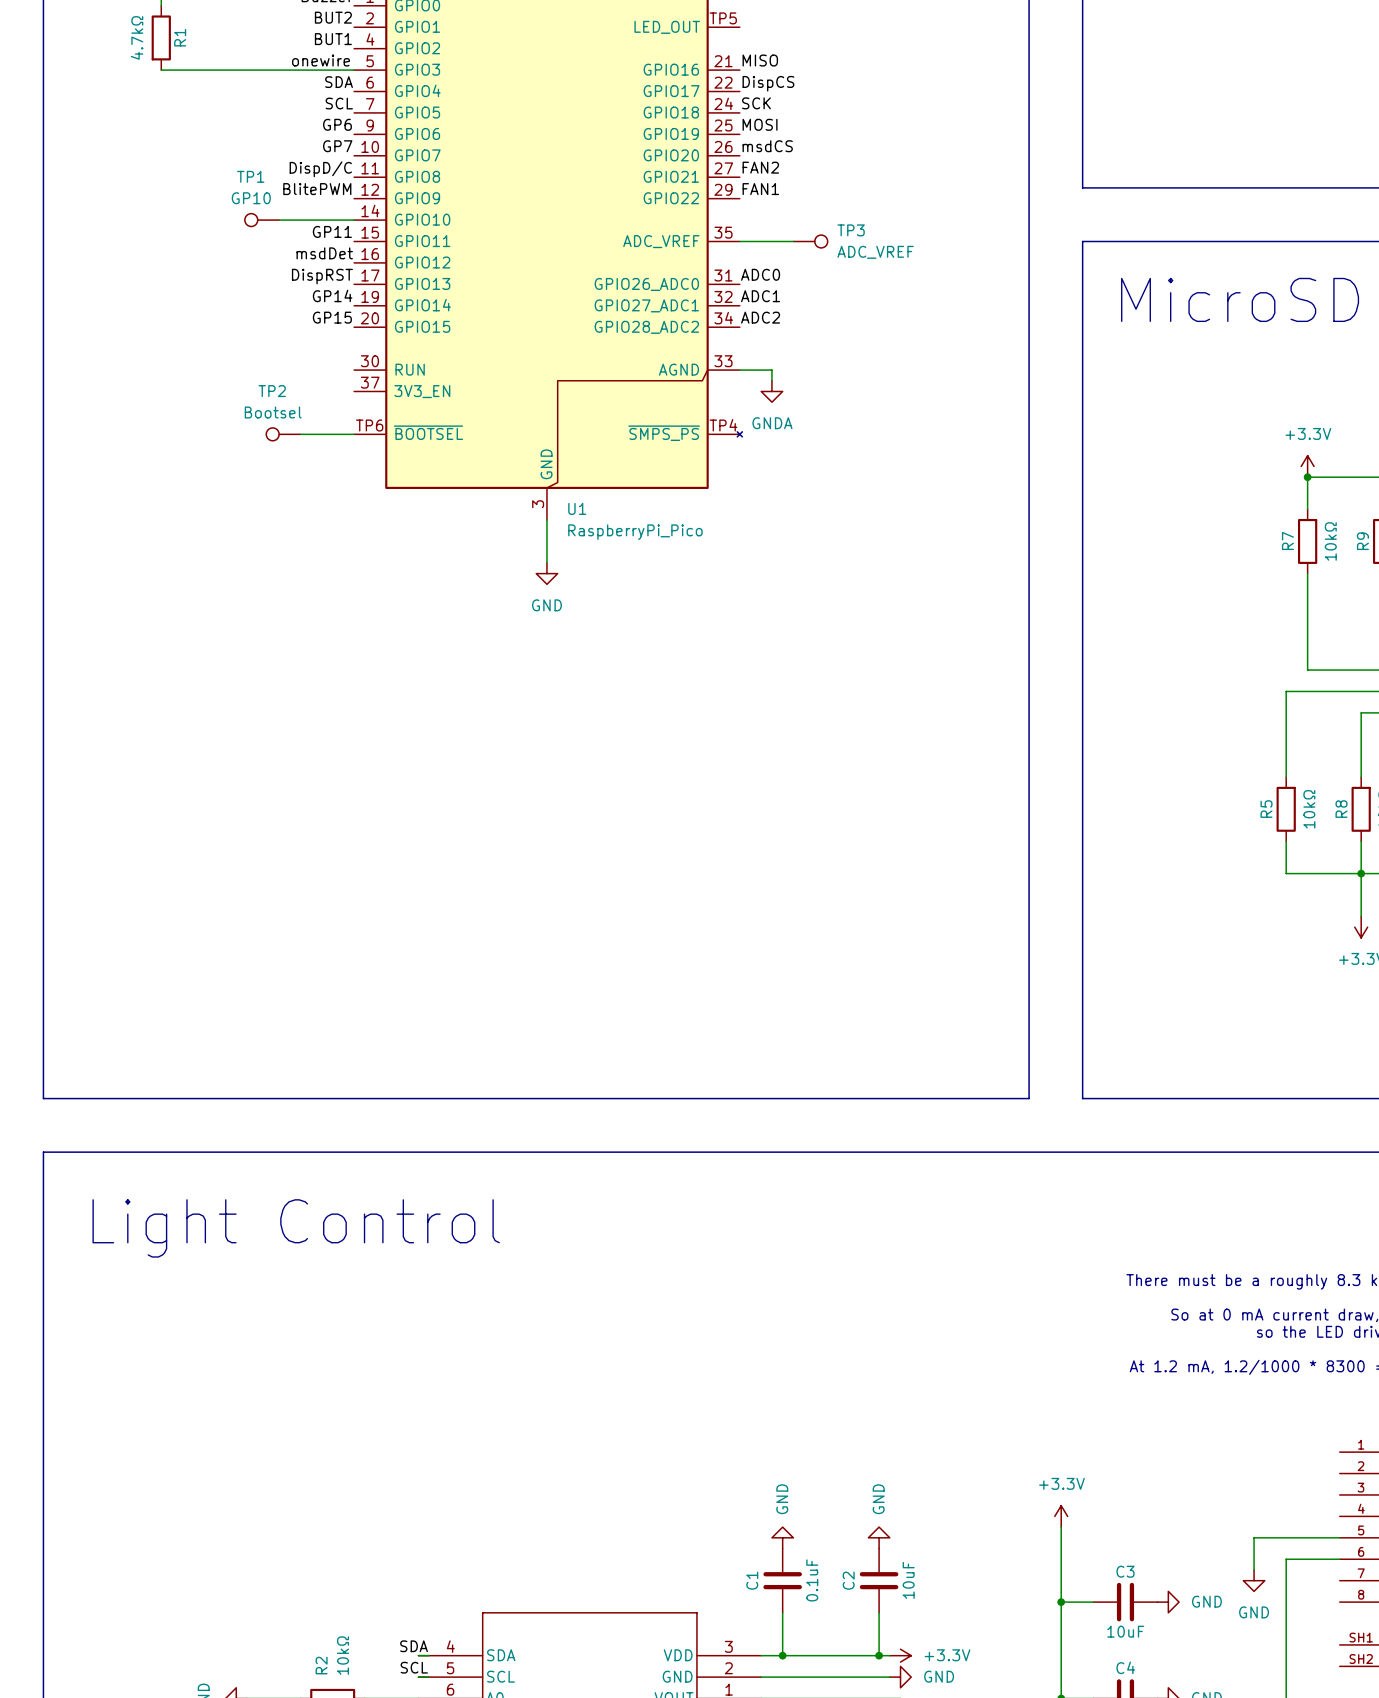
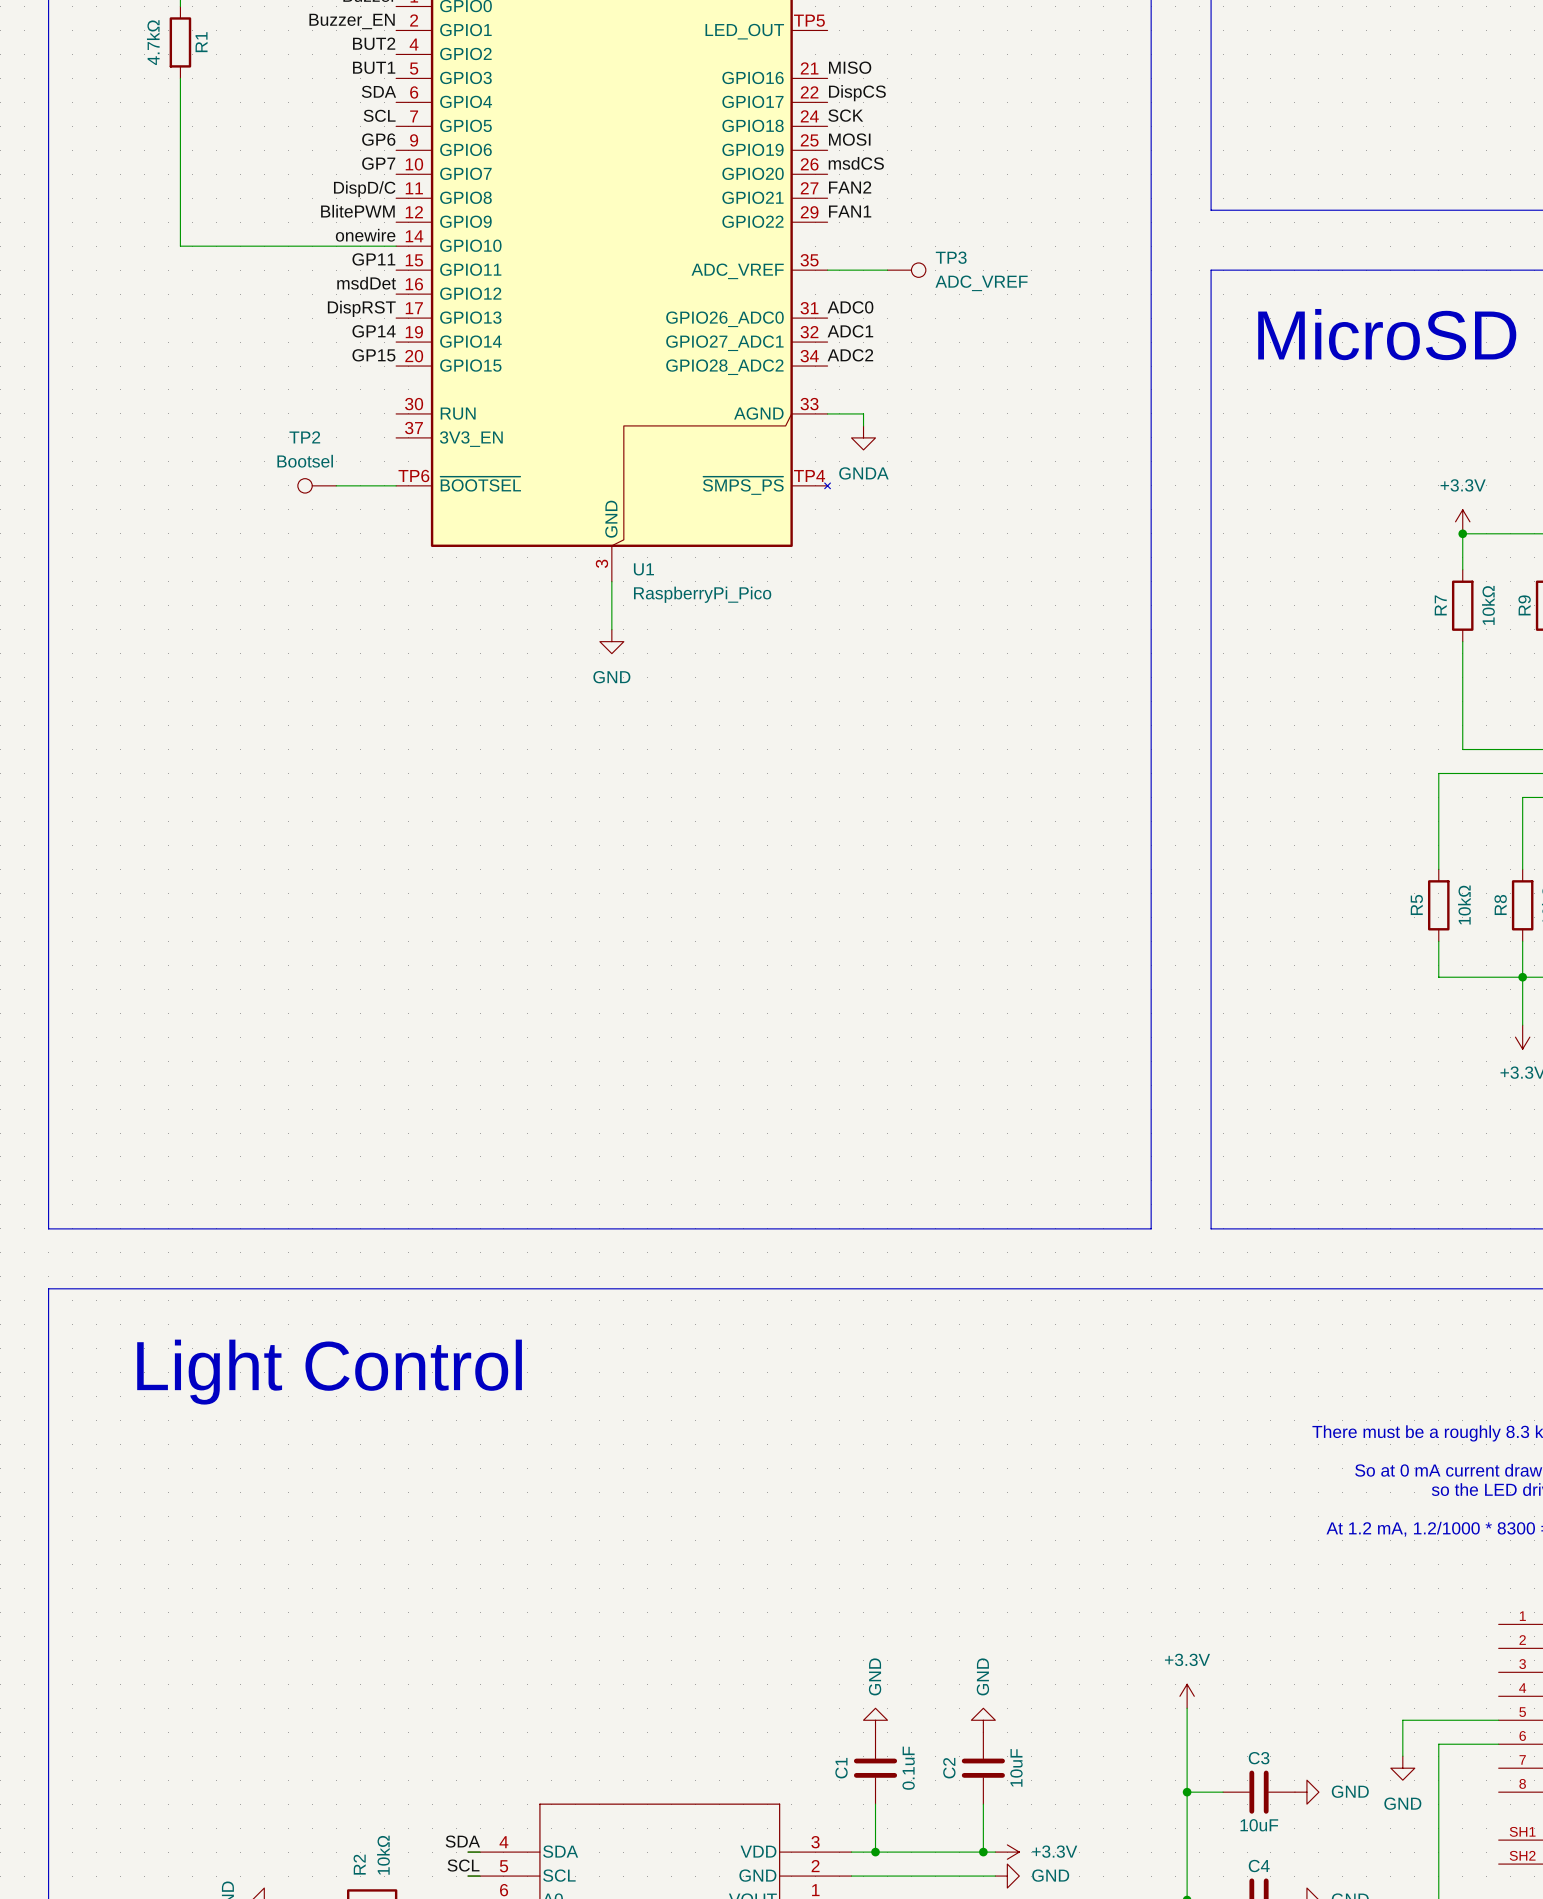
label: BUT2 (333, 17) -> Buzzer_EN (352, 21)
label: BUT1 (333, 39) -> BUT2 (374, 43)
label position: onewire (321, 60) -> onewire (365, 235)
label: none -> BUT1 (374, 67)
wire: (161, 70) (354, 70) -> (180, 78) (180, 246) (312, 246)
TP1: GP10 (261, 220) -> none

